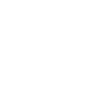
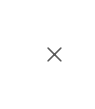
no-connect mark: none -> (54, 54)

